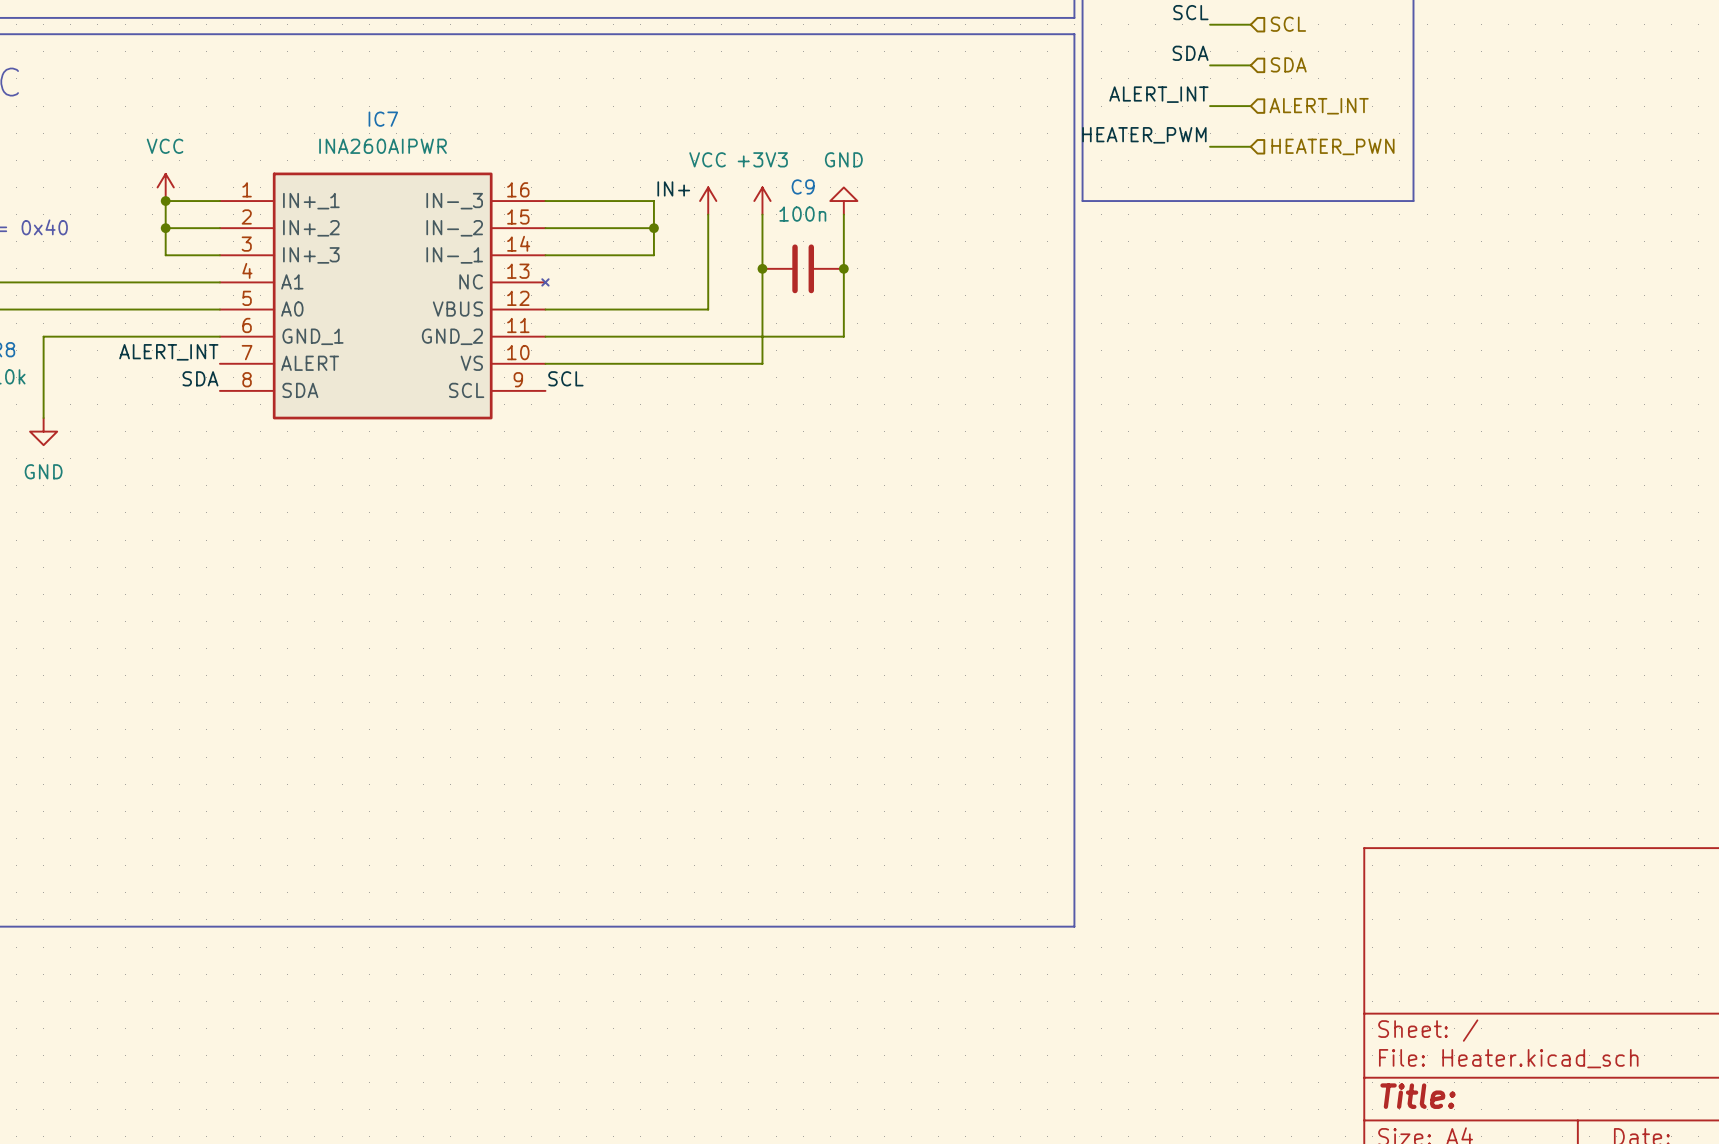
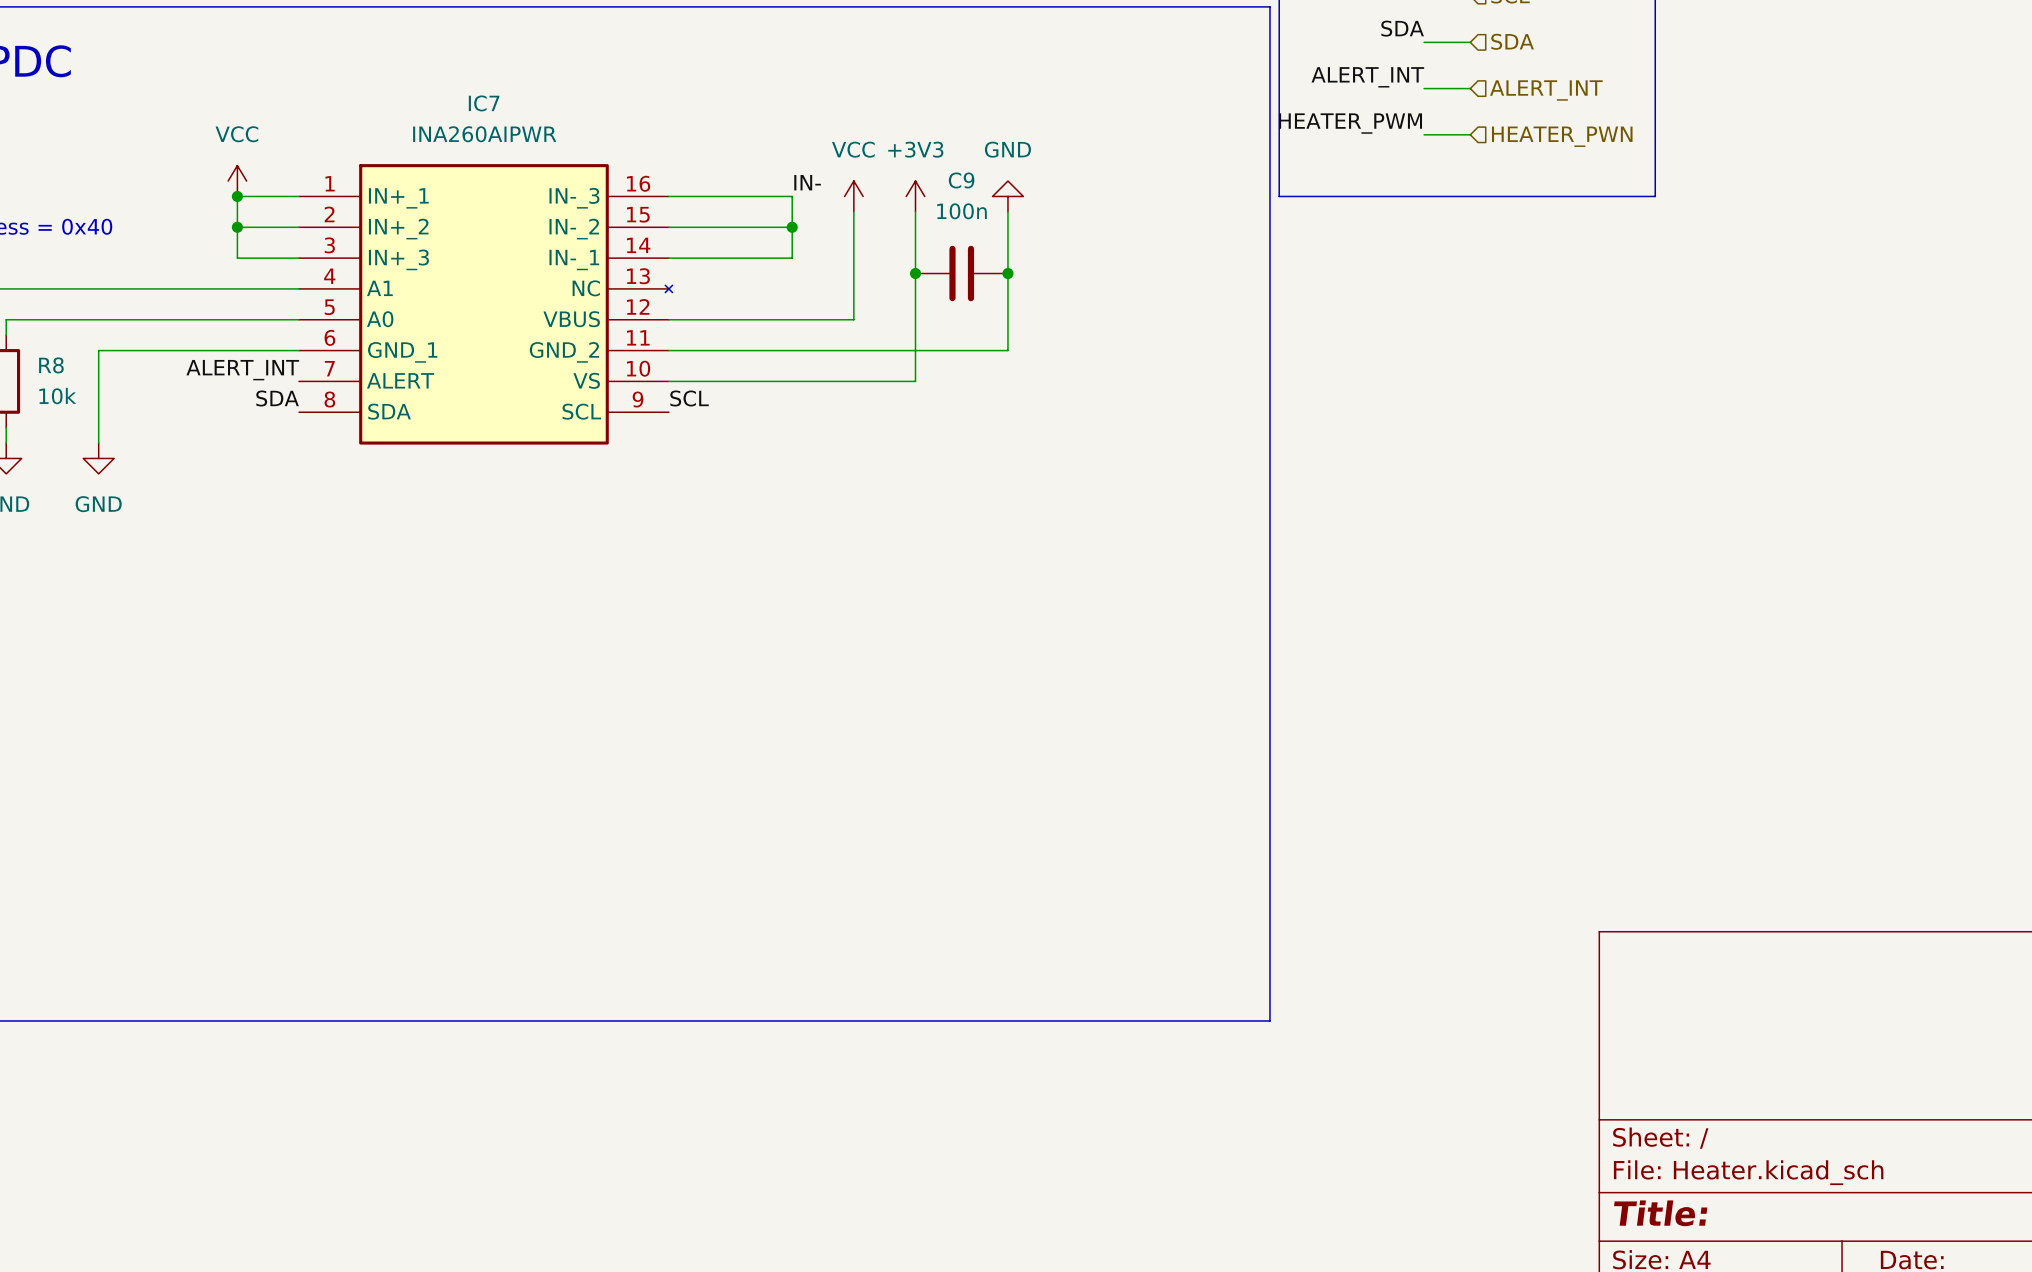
label: IN+ (673, 188) -> IN- (807, 182)

